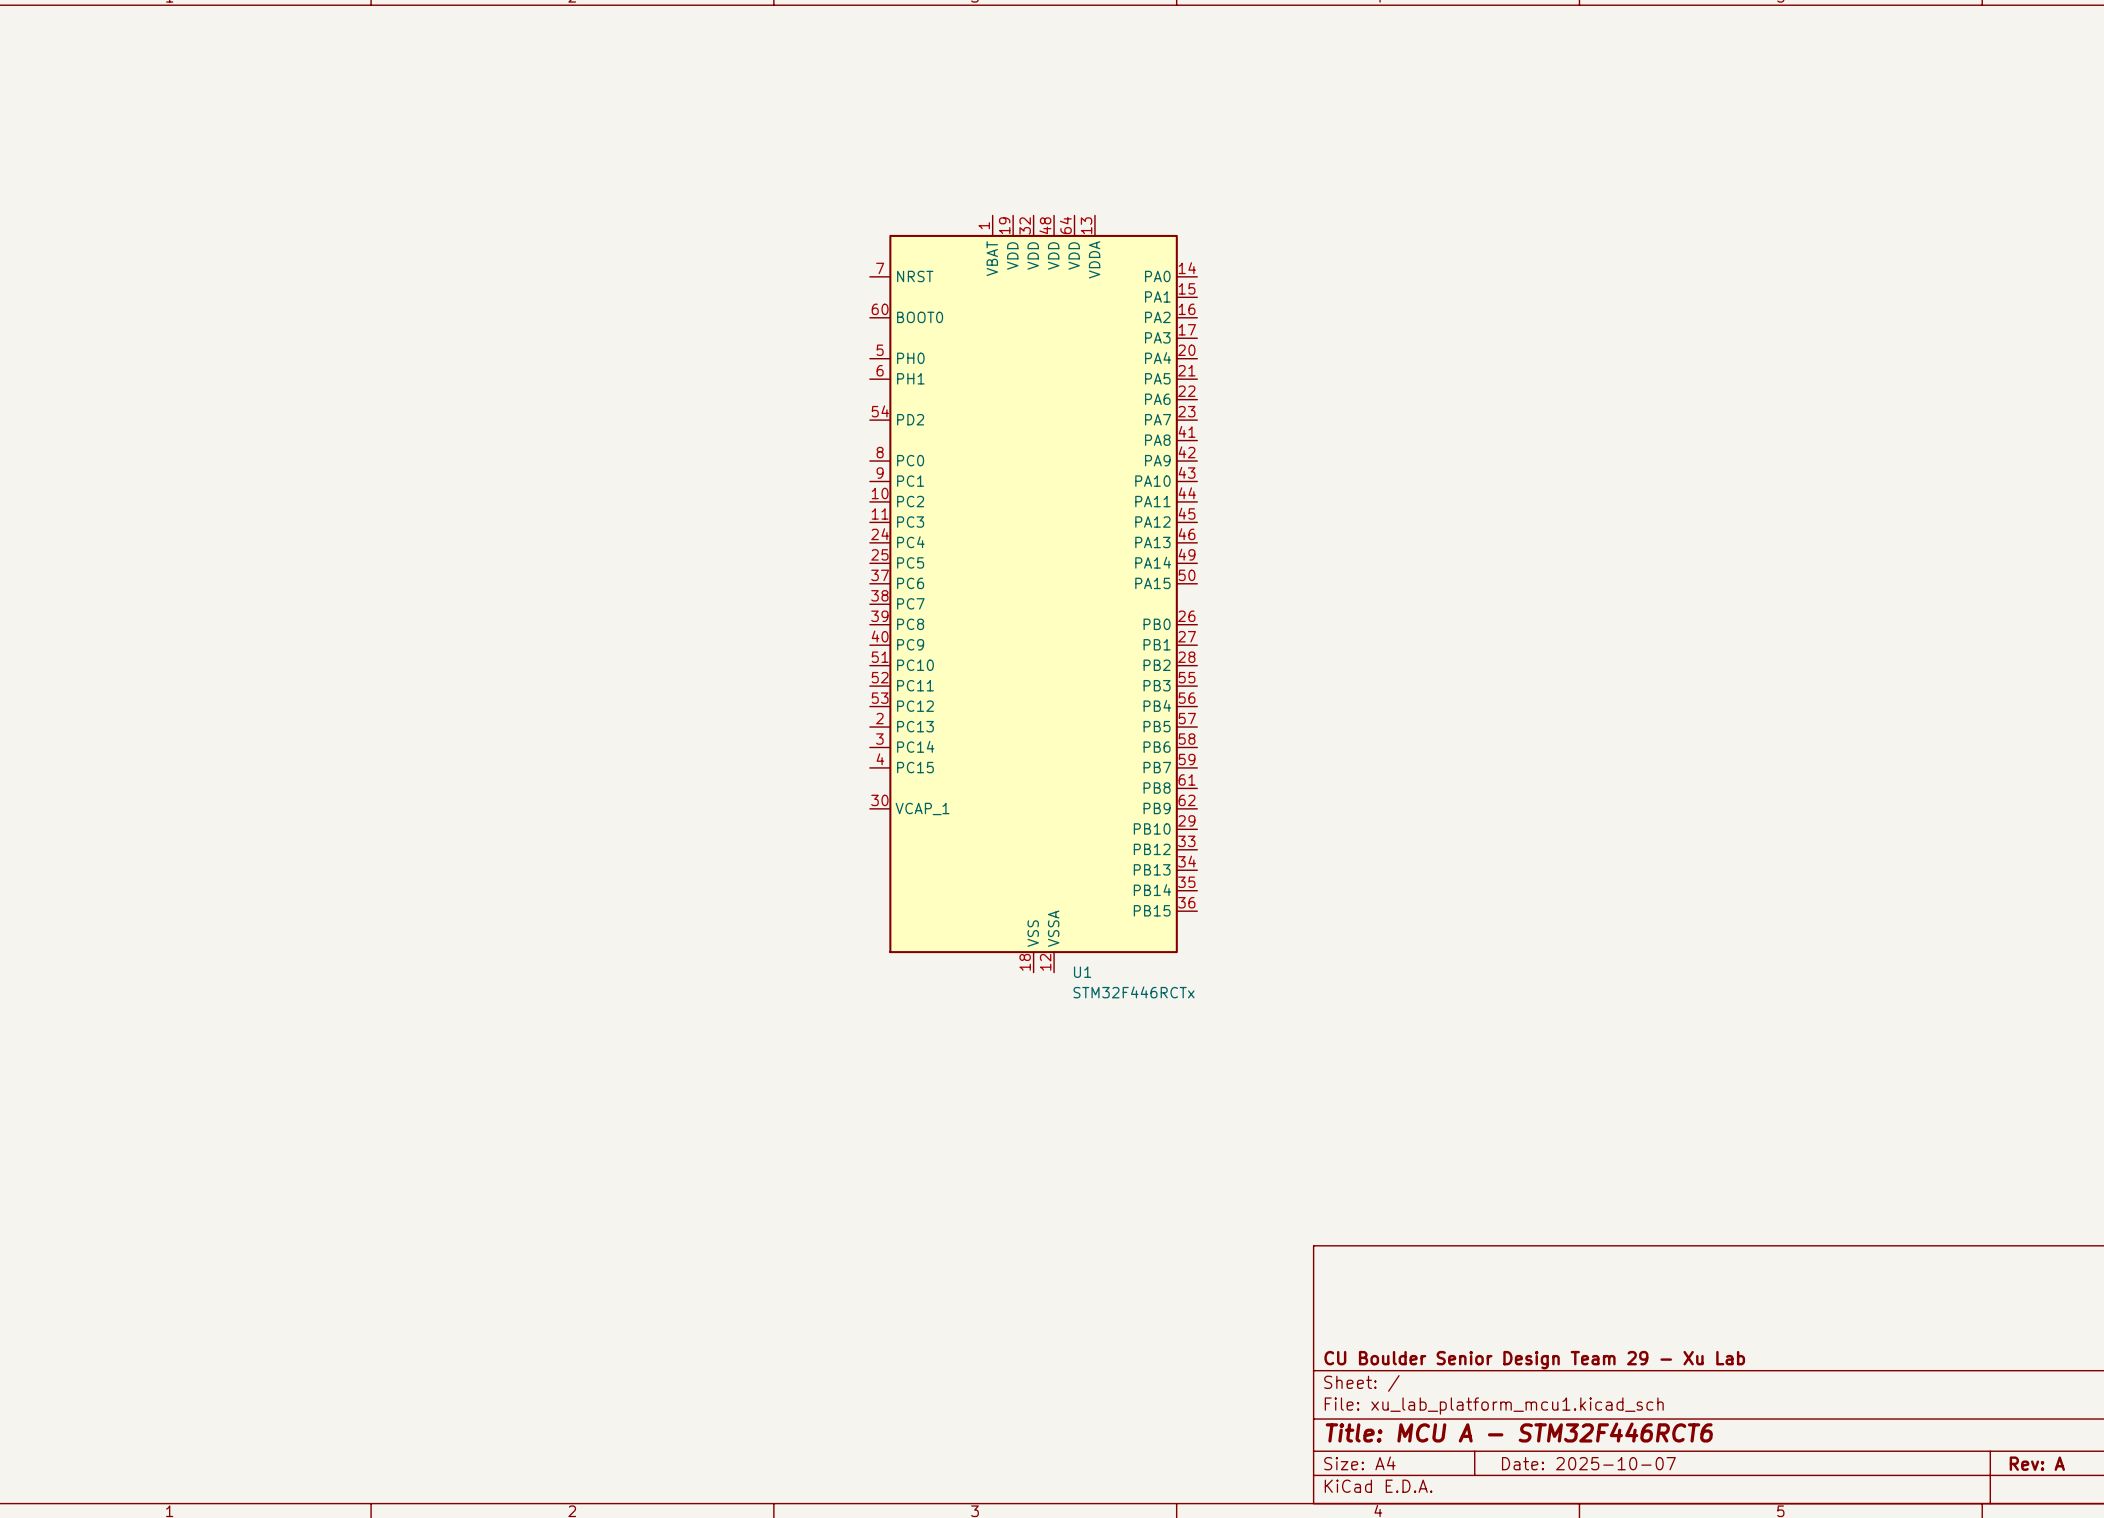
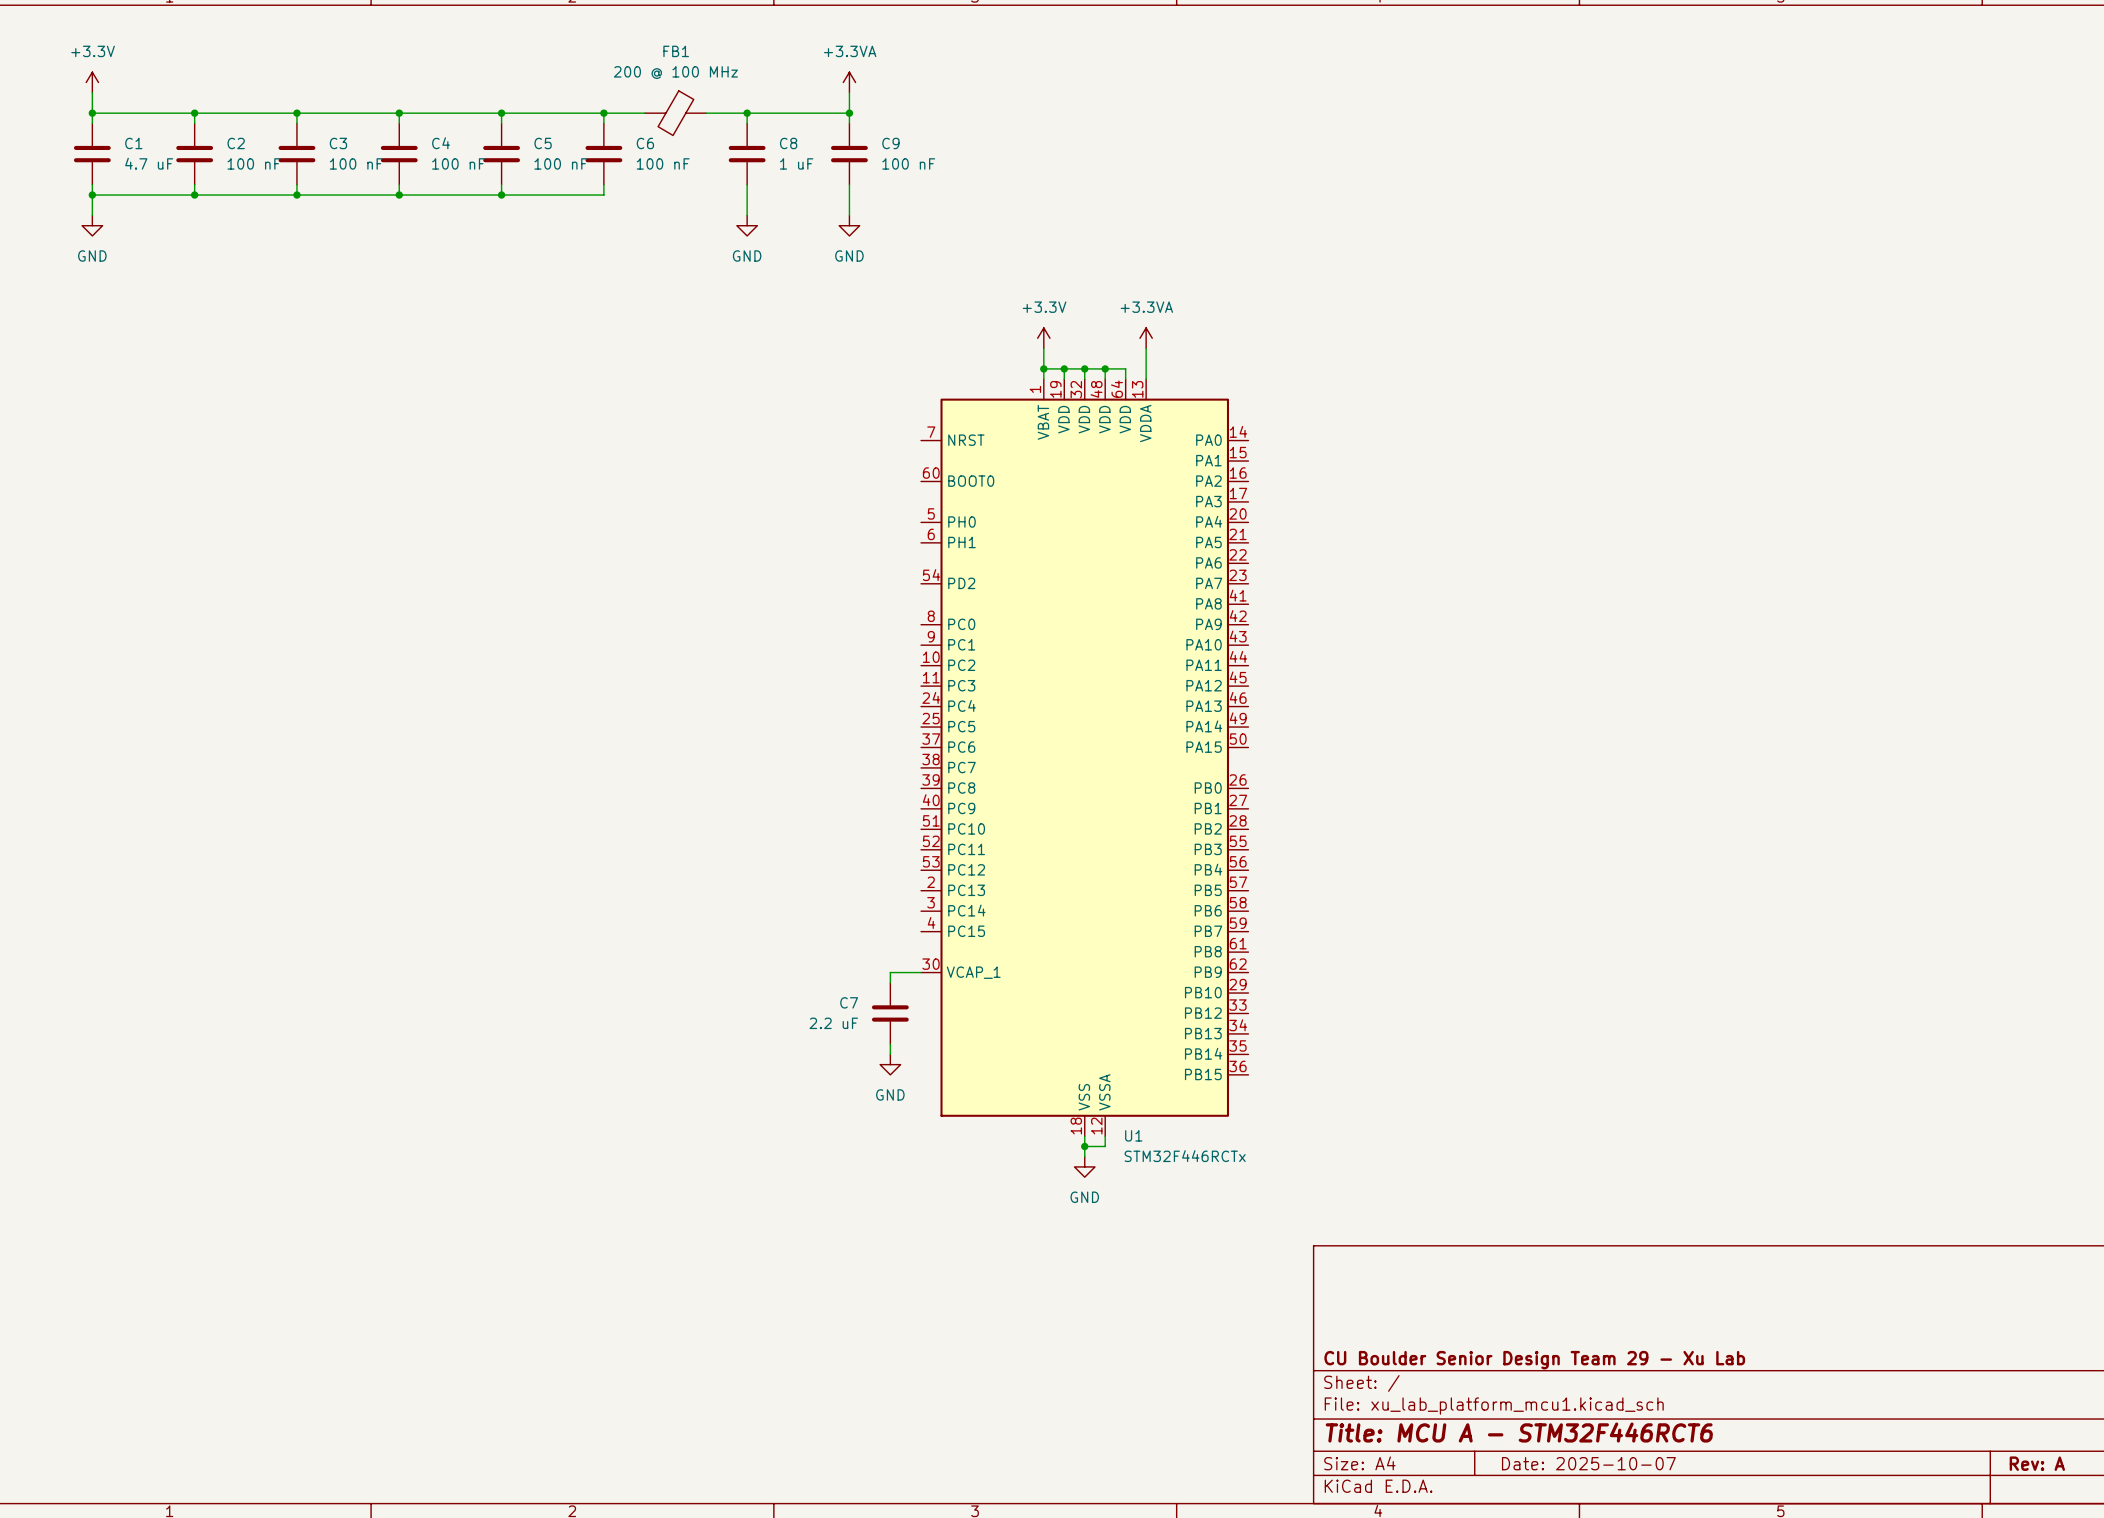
power symbol: none -> +3.3V (92, 82)
power symbol: none -> +3.3VA (849, 82)
wire: none -> (92, 92) (92, 123)
wire: none -> (849, 92) (849, 123)
wire: none -> (92, 113) (644, 113)
junction: none -> (92, 113)
wire: none -> (194, 113) (194, 123)
junction: none -> (194, 113)
wire: none -> (296, 113) (296, 123)
junction: none -> (296, 113)
wire: none -> (399, 113) (399, 123)
junction: none -> (399, 113)
wire: none -> (501, 113) (501, 123)
junction: none -> (501, 113)
wire: none -> (603, 113) (603, 123)
junction: none -> (603, 113)
FB1: none -> 200 @ 100 MHz (675, 113)
wire: none -> (706, 113) (849, 113)
wire: none -> (747, 113) (747, 123)
junction: none -> (747, 113)
junction: none -> (849, 113)
C1: none -> 4.7 uF (92, 154)
C2: none -> 100 nF (194, 154)
C3: none -> 100 nF (296, 154)
C4: none -> 100 nF (399, 154)
C5: none -> 100 nF (501, 154)
C6: none -> 100 nF (603, 154)
C8: none -> 1 uF (747, 154)
C9: none -> 100 nF (849, 154)
wire: none -> (92, 184) (92, 215)
wire: none -> (194, 184) (194, 195)
wire: none -> (296, 184) (296, 195)
wire: none -> (399, 184) (399, 195)
wire: none -> (501, 184) (501, 195)
wire: none -> (603, 184) (603, 195) (92, 195)
wire: none -> (747, 184) (747, 215)
wire: none -> (849, 184) (849, 215)
junction: none -> (92, 195)
junction: none -> (194, 195)
junction: none -> (296, 195)
junction: none -> (399, 195)
junction: none -> (501, 195)
power symbol: none -> GND (92, 225)
power symbol: none -> GND (747, 225)
power symbol: none -> GND (849, 225)
power symbol: none -> +3.3V (1043, 338)
power symbol: none -> +3.3VA (1146, 338)
junction: none -> (1043, 368)
junction: none -> (1064, 368)
junction: none -> (1084, 368)
junction: none -> (1105, 368)
U1 position: (1033, 594) -> (1084, 757)
wire: none -> (921, 972) (890, 972) (890, 982)
C7: none -> 2.2 uF (890, 1013)
wire: none -> (890, 1044) (890, 1054)
power symbol: none -> GND (890, 1064)
wire: none -> (1084, 1136) (1084, 1156)
wire: none -> (1105, 1136) (1105, 1146) (1084, 1146)
junction: none -> (1084, 1146)
power symbol: none -> GND (1084, 1166)

